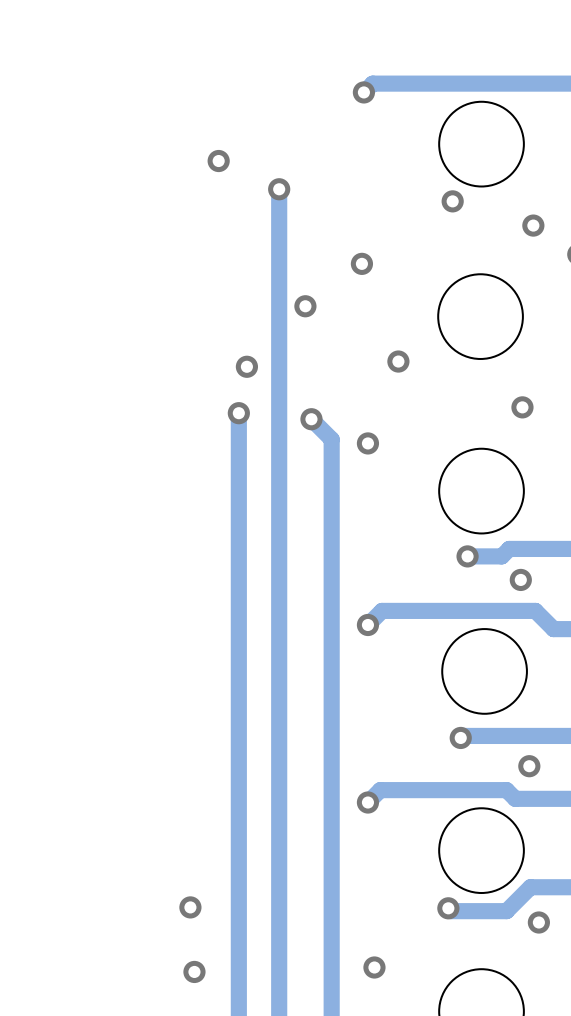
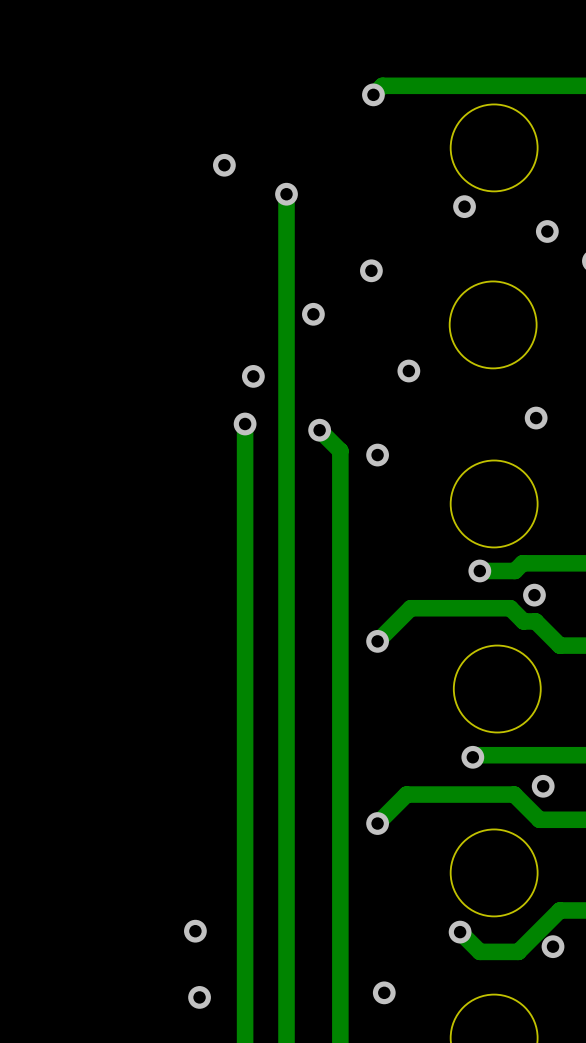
track: (382, 610) (535, 610) (553, 629) -> (392, 626) (410, 608) (510, 608) (523, 621) (535, 621) (559, 645) (568, 645)
track: (380, 790) (506, 790) (515, 798) (525, 798) -> (390, 810) (406, 794) (514, 794) (539, 819)
track: (545, 887) (530, 887) (506, 911) (451, 911) -> (559, 910) (518, 951) (479, 951) (463, 935)

